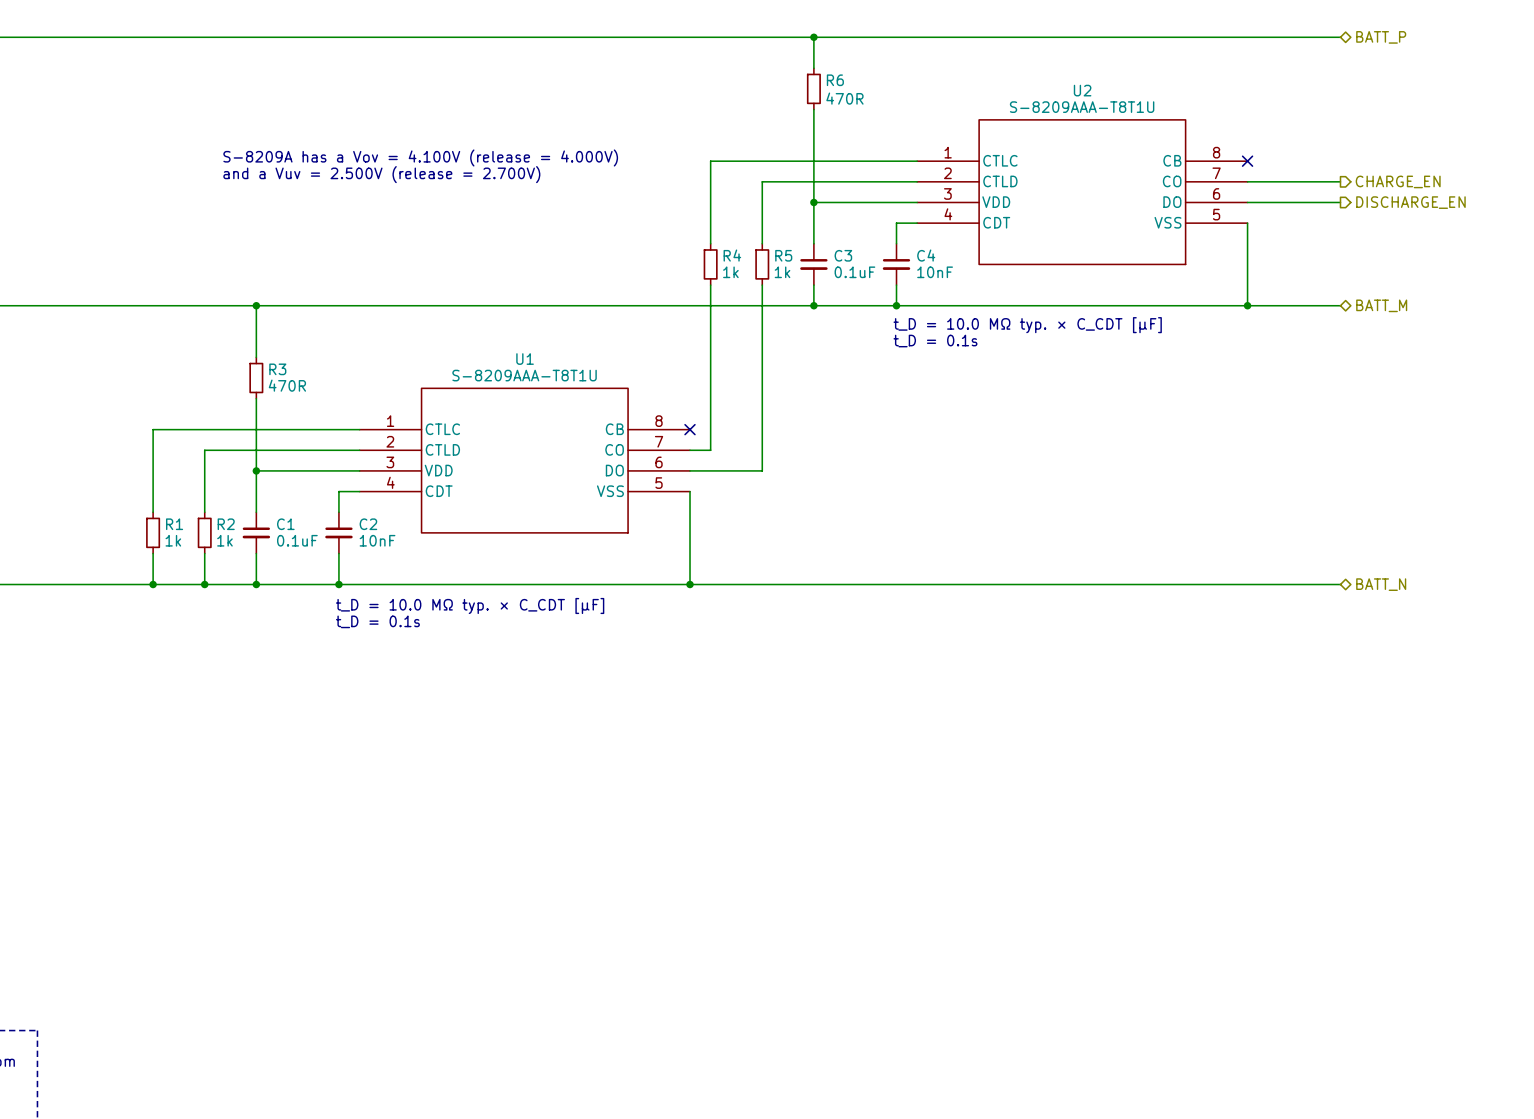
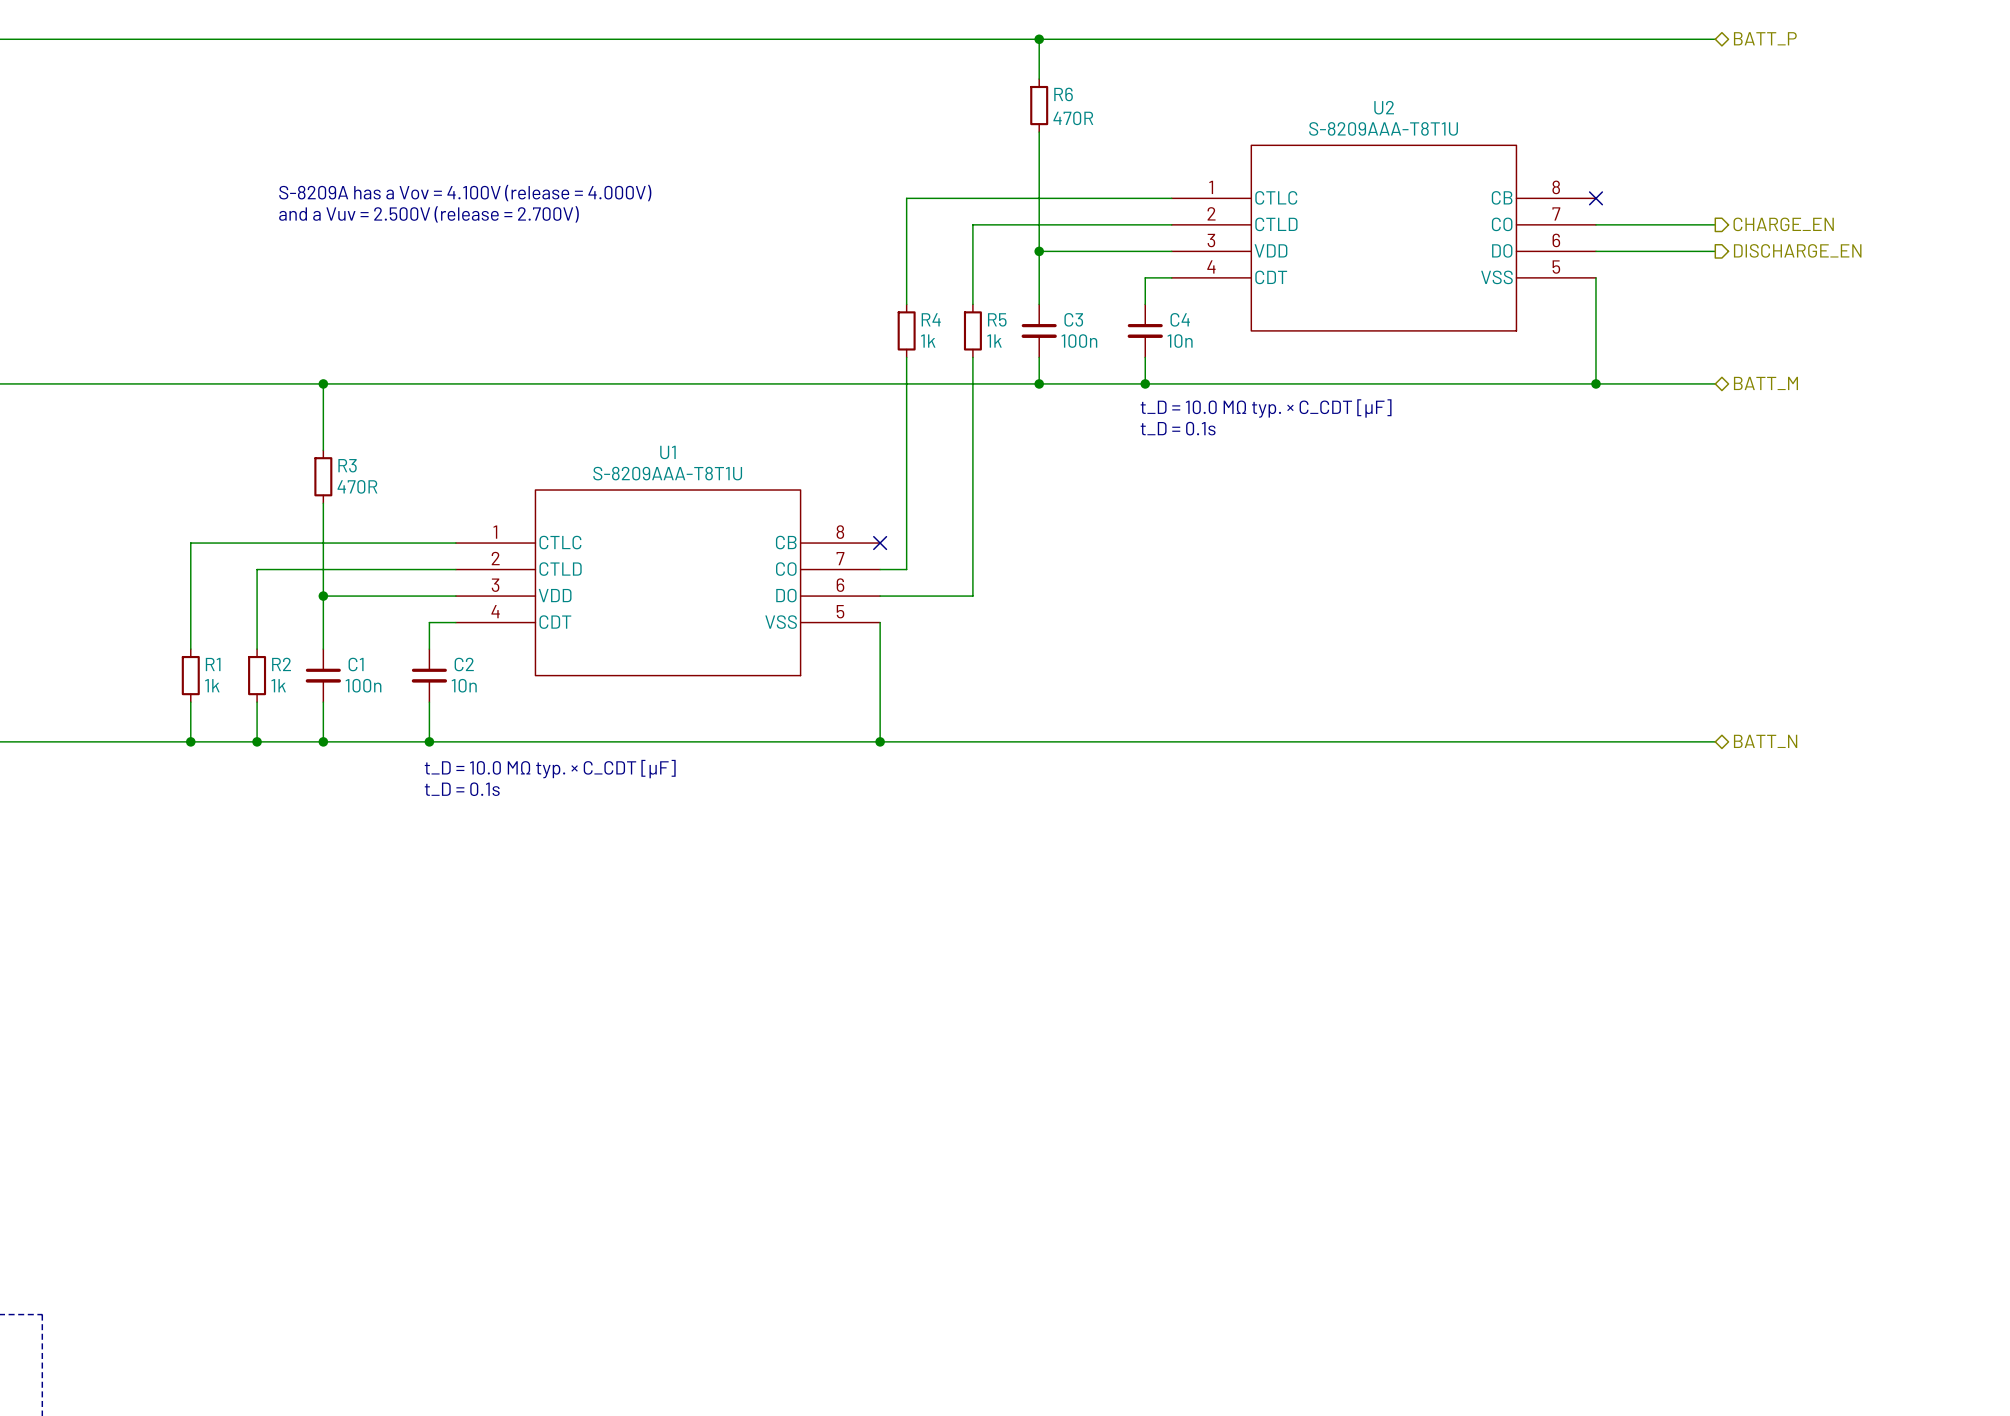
C3 value: 0.1uF (854, 272) -> 100n (1079, 341)
C4 value: 10nF (935, 272) -> 10n (1180, 341)
C1 value: 0.1uF (297, 540) -> 100n (363, 685)
C2 value: 10nF (377, 540) -> 10n (464, 685)

